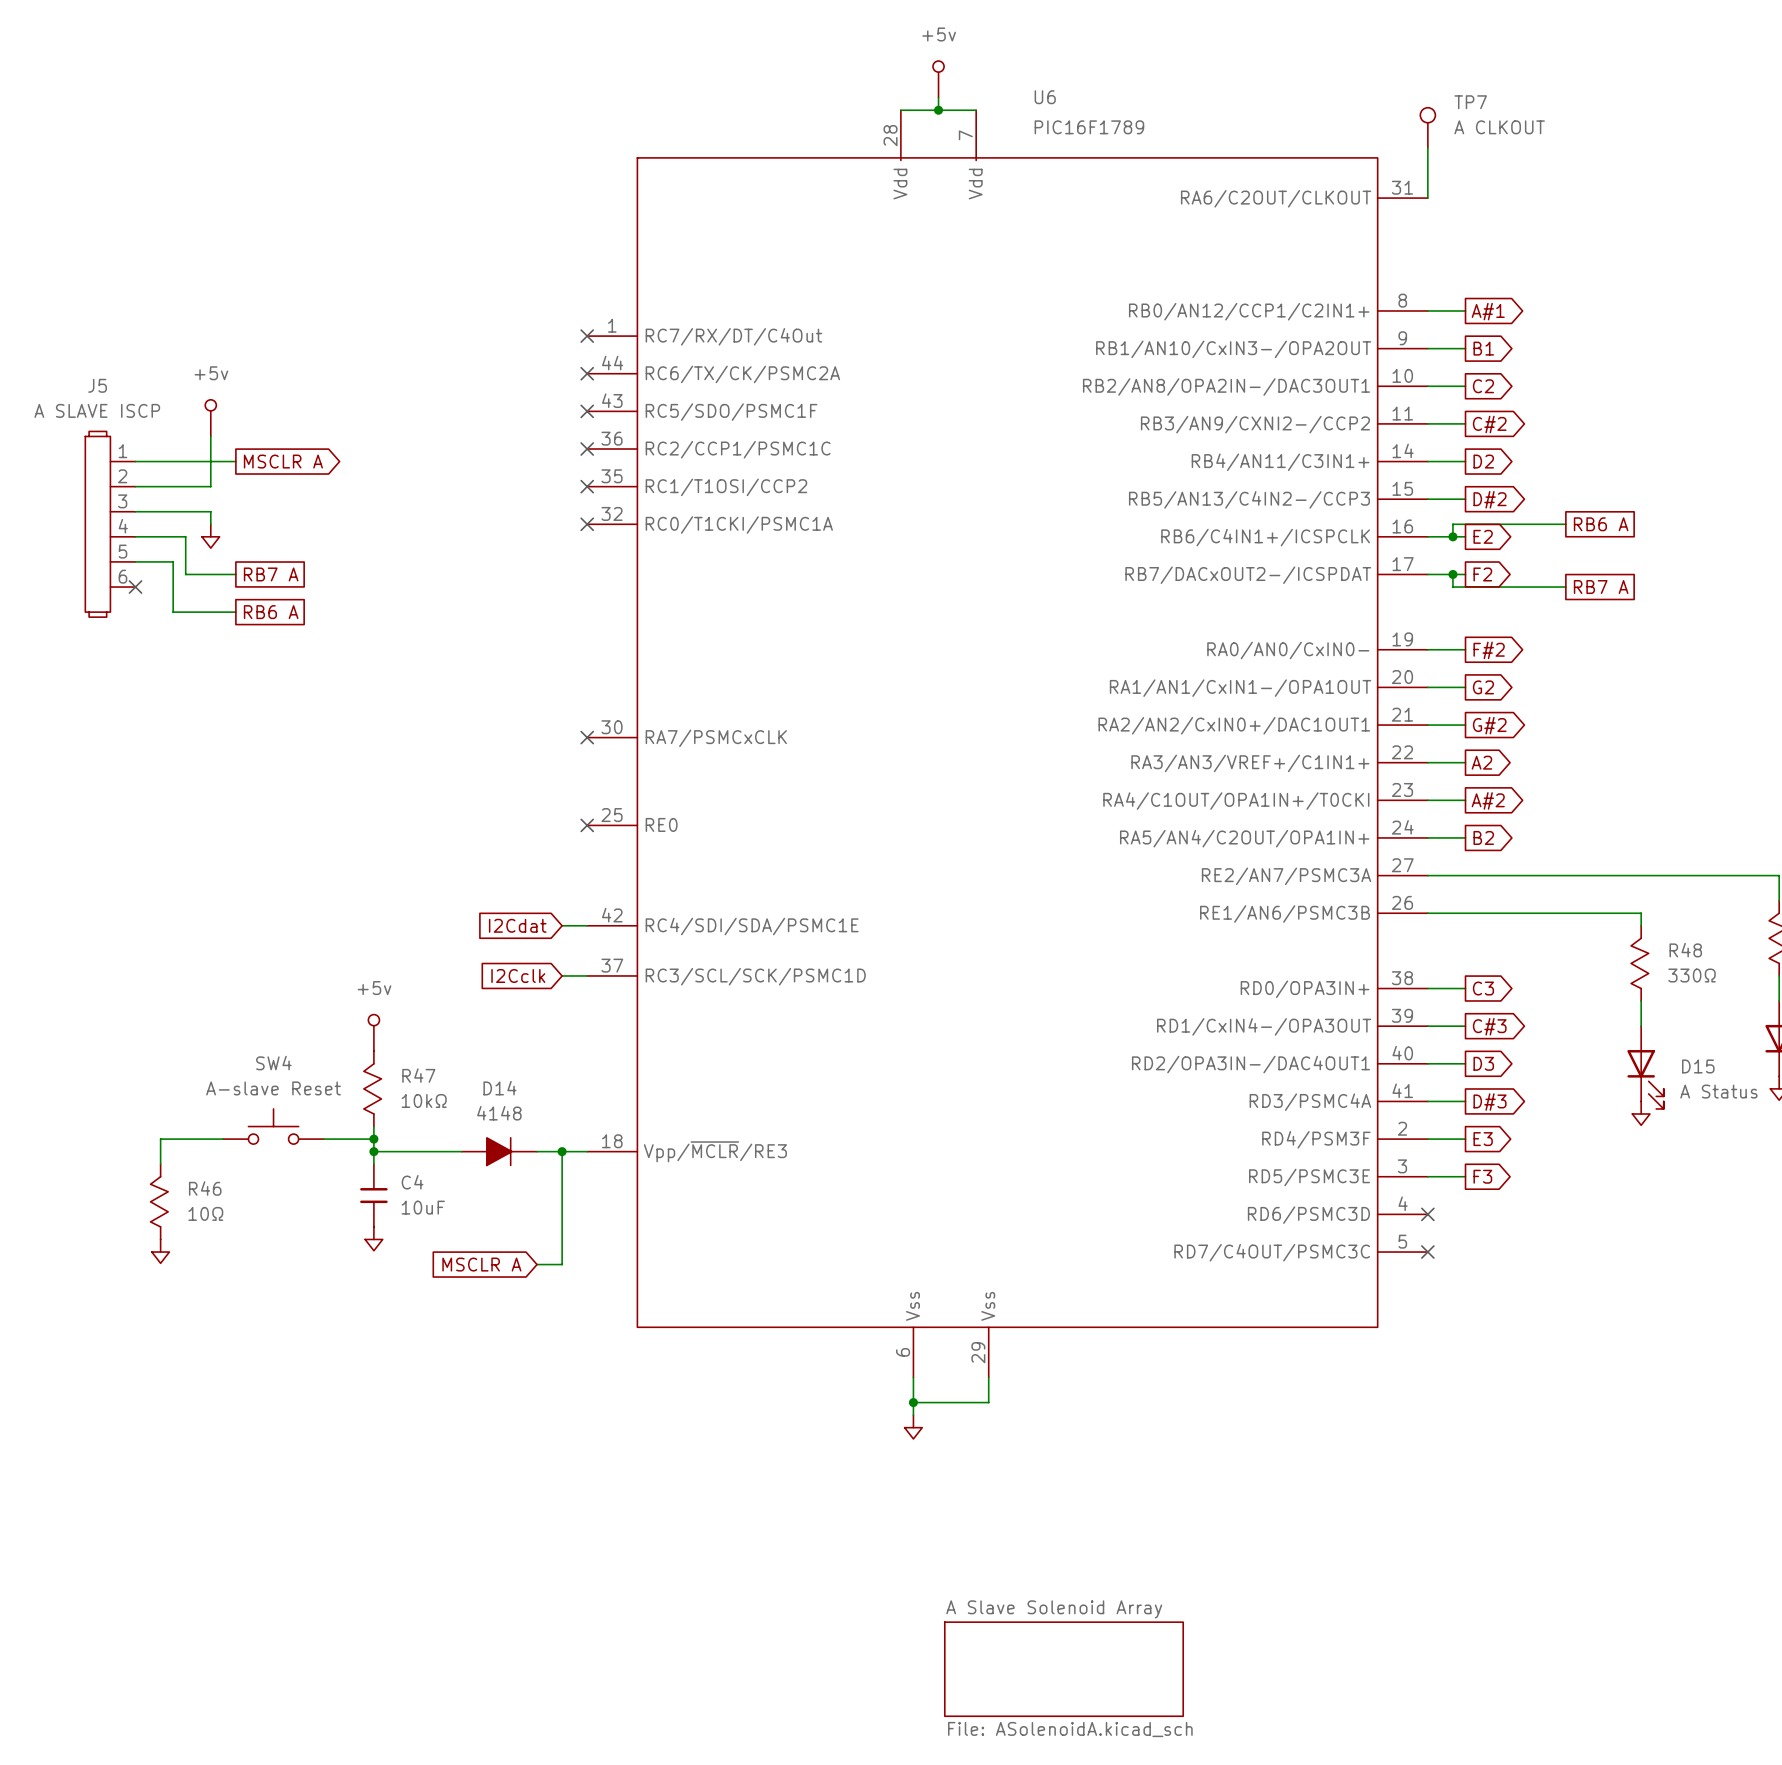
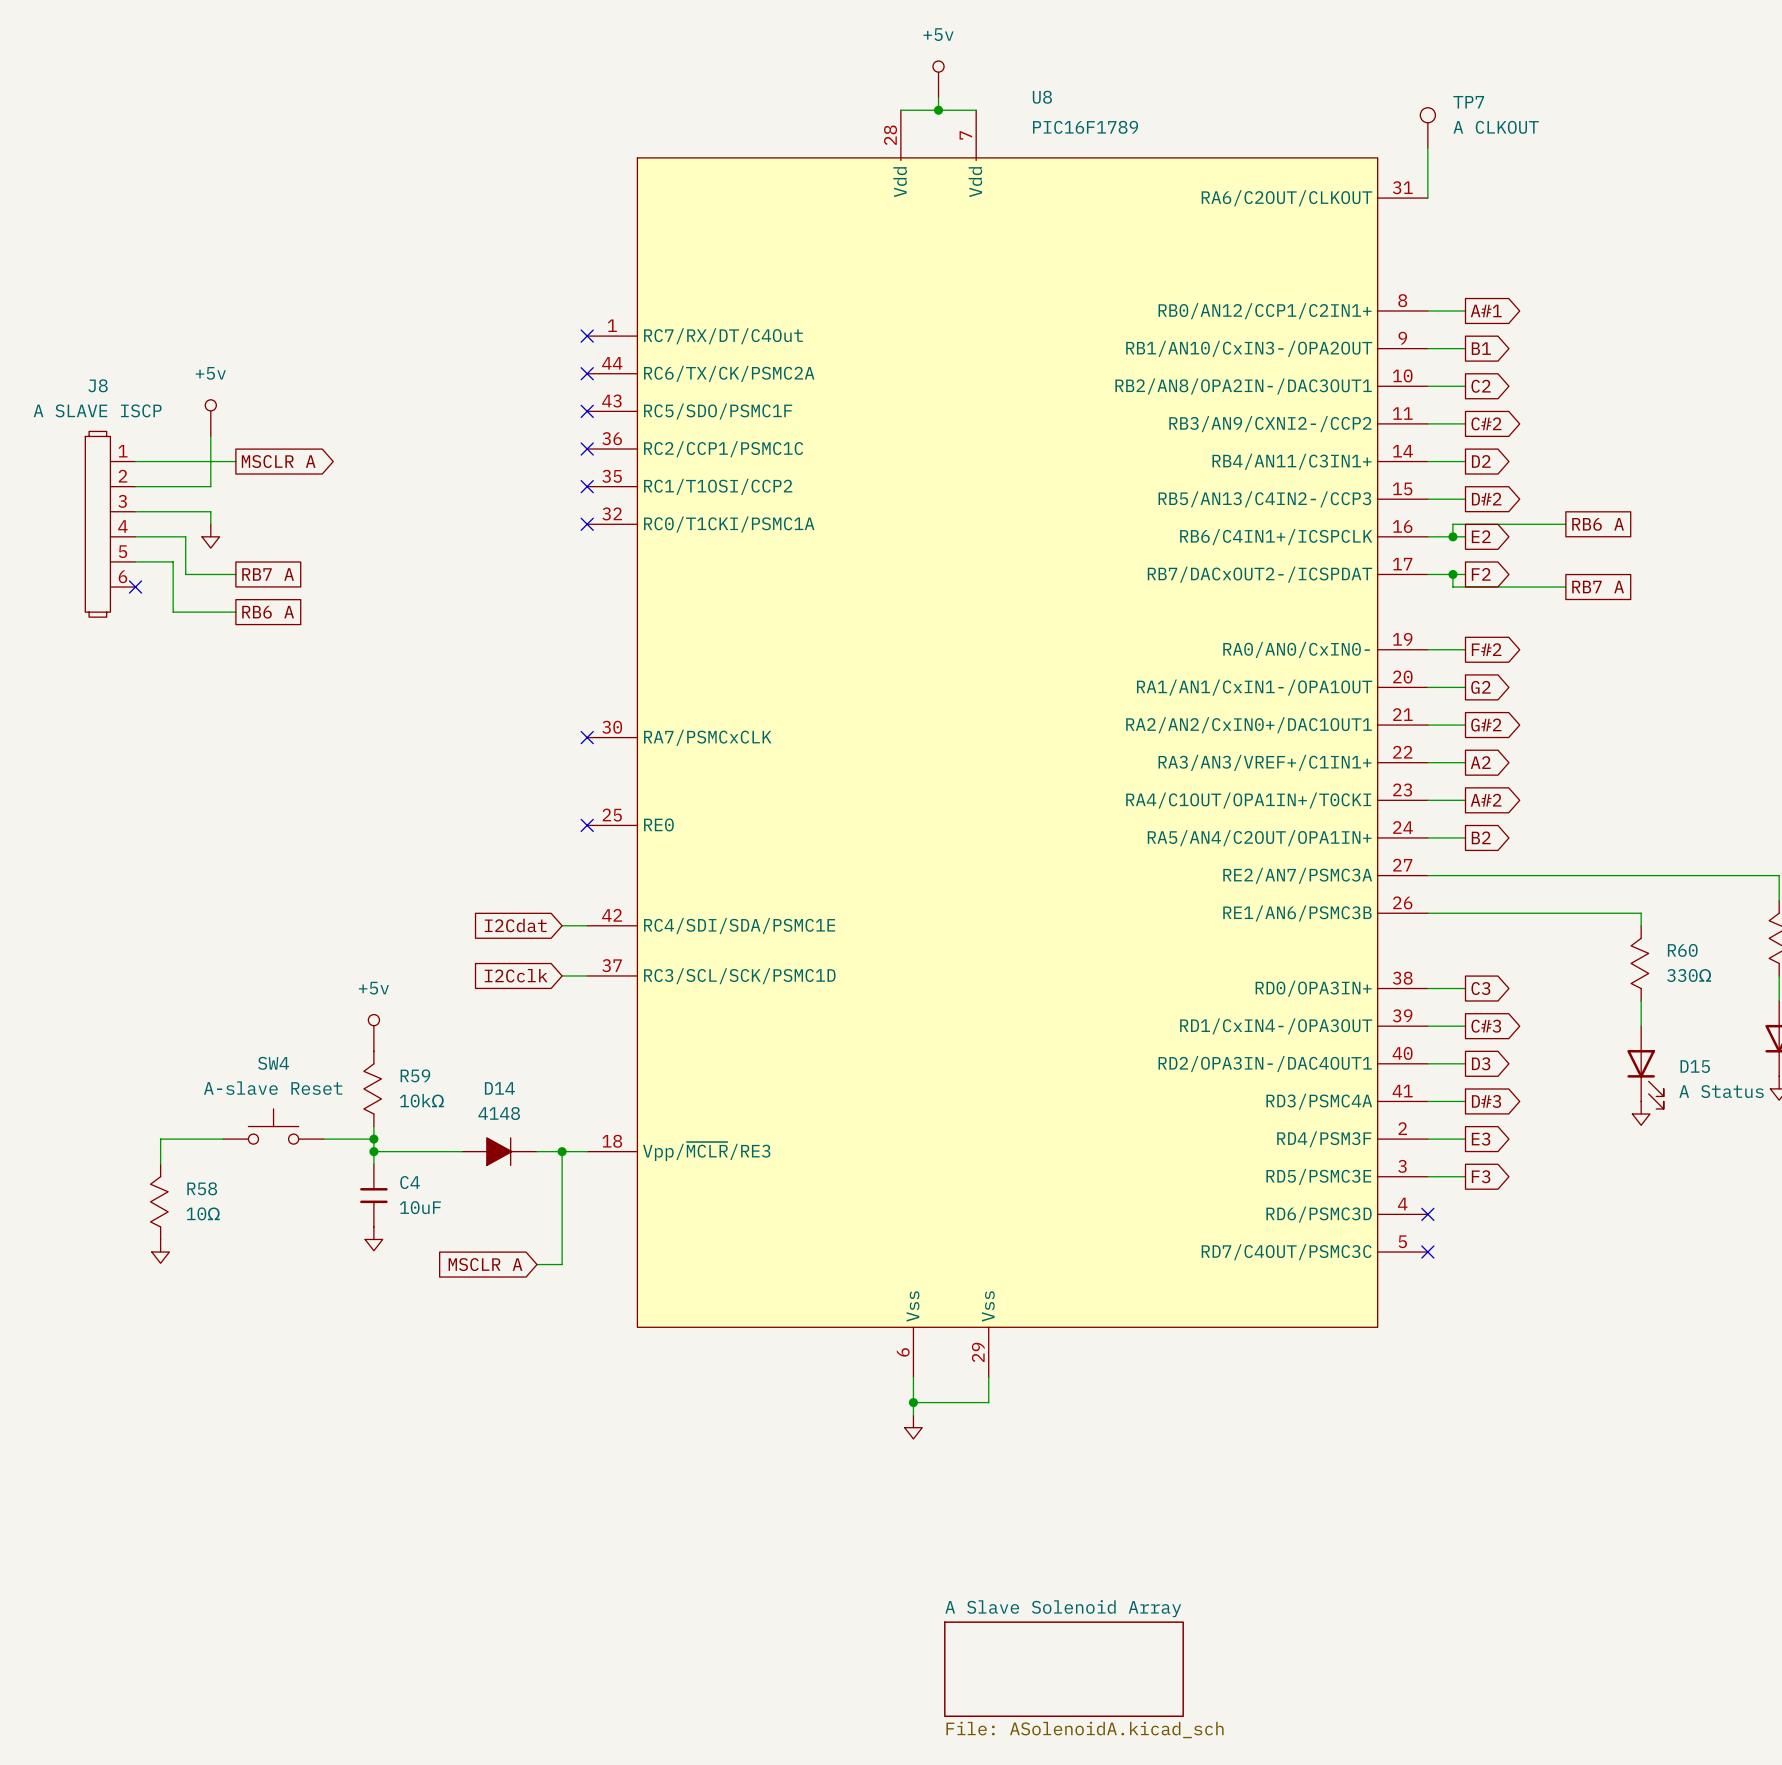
U6 name: U6 (1045, 97) -> U8 (1042, 97)
J5 name: J5 (97, 385) -> J8 (98, 385)
R48 name: R48 (1685, 950) -> R60 (1682, 950)
R47 name: R47 (418, 1075) -> R59 (415, 1075)
R46 name: R46 (205, 1188) -> R58 (202, 1188)

